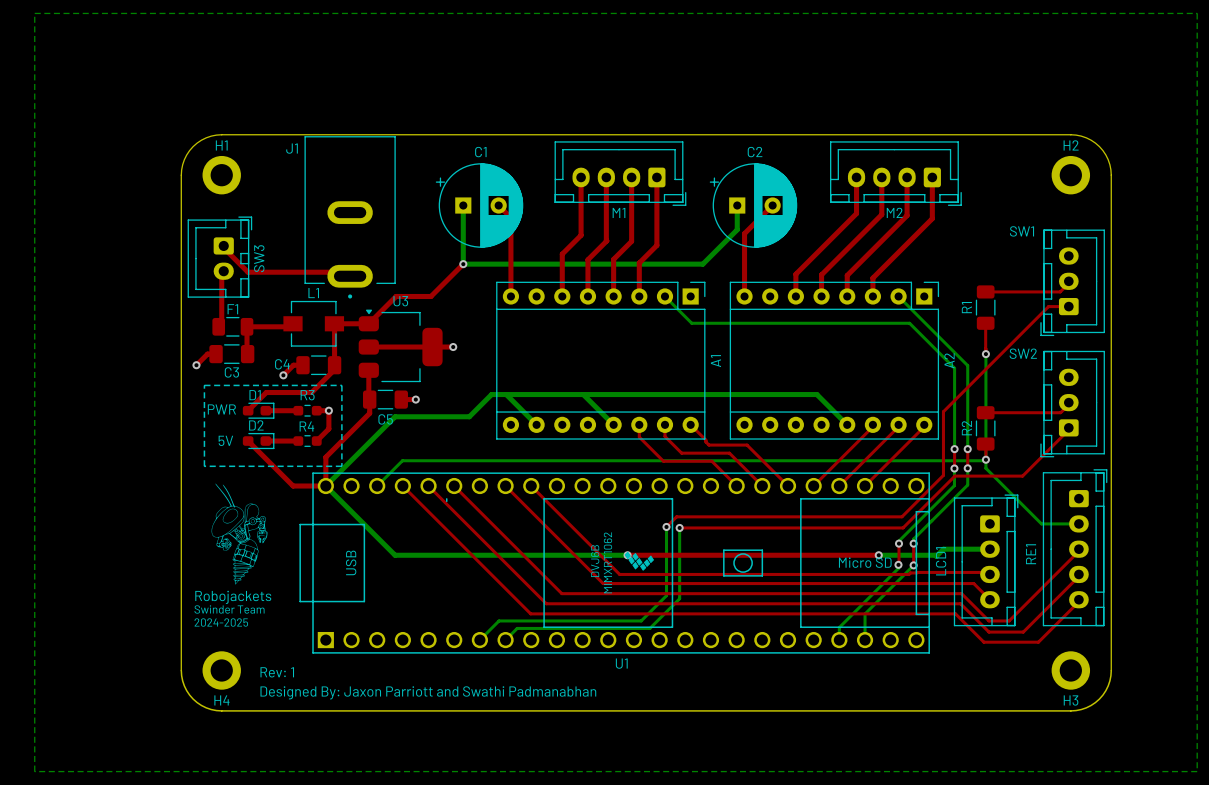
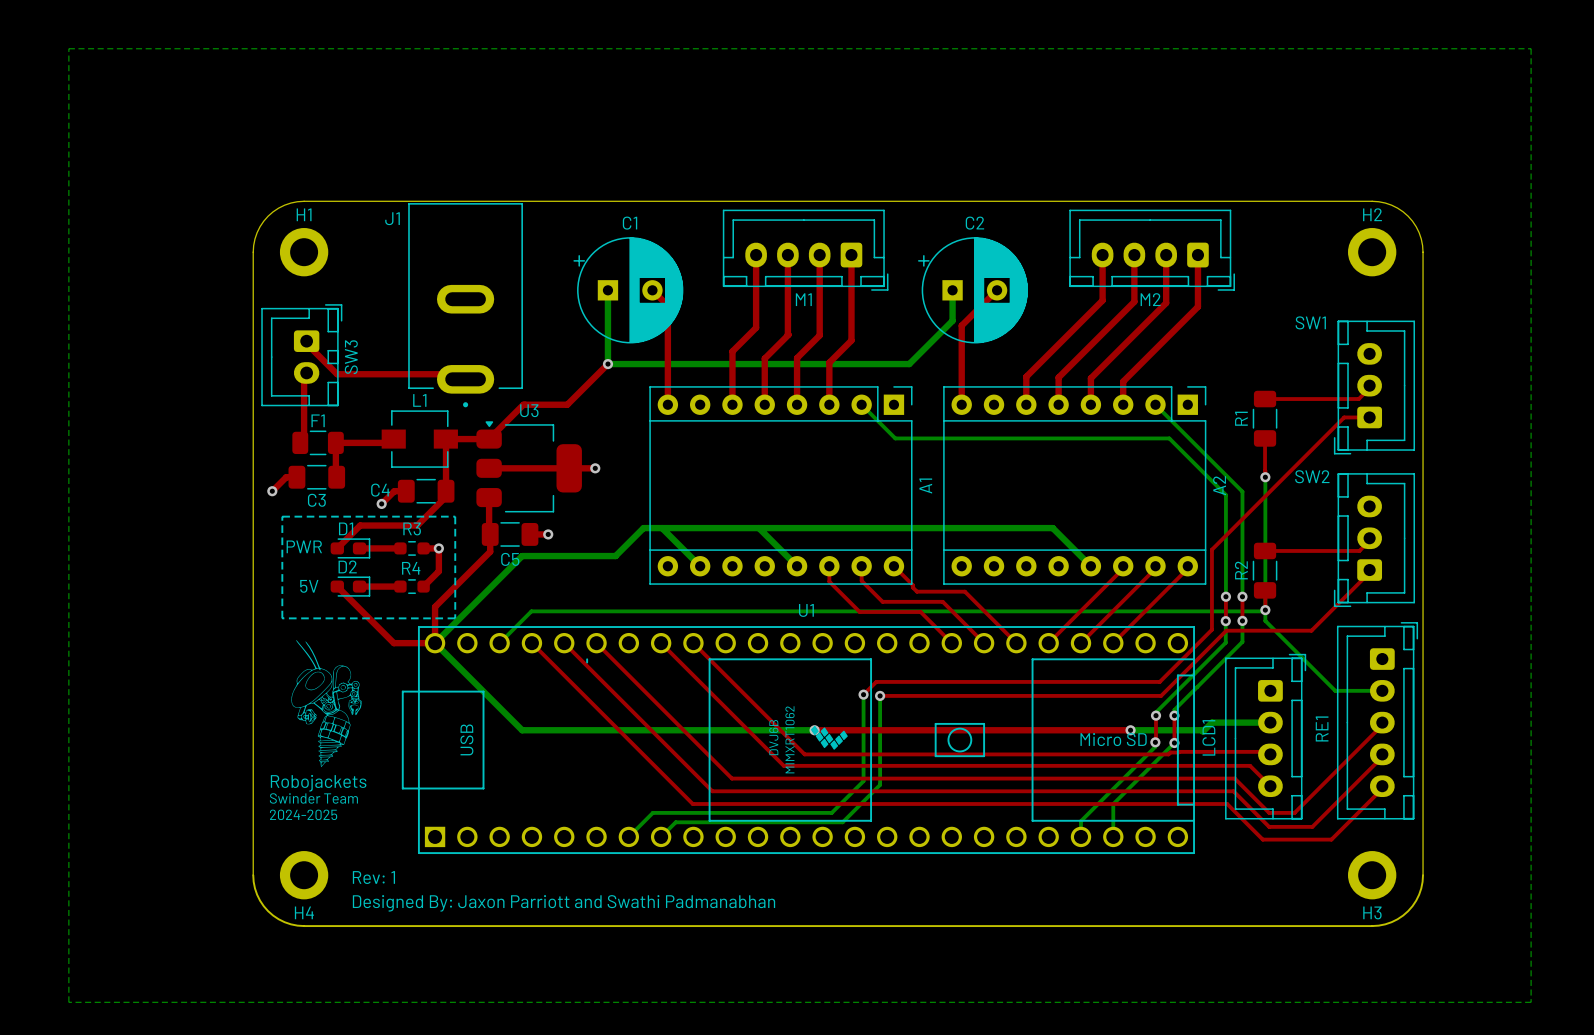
U1 footprint: [299, 472, 930, 654] -> [401, 626, 1195, 855]
U1 name position: U1 (621, 663) -> U1 (806, 610)

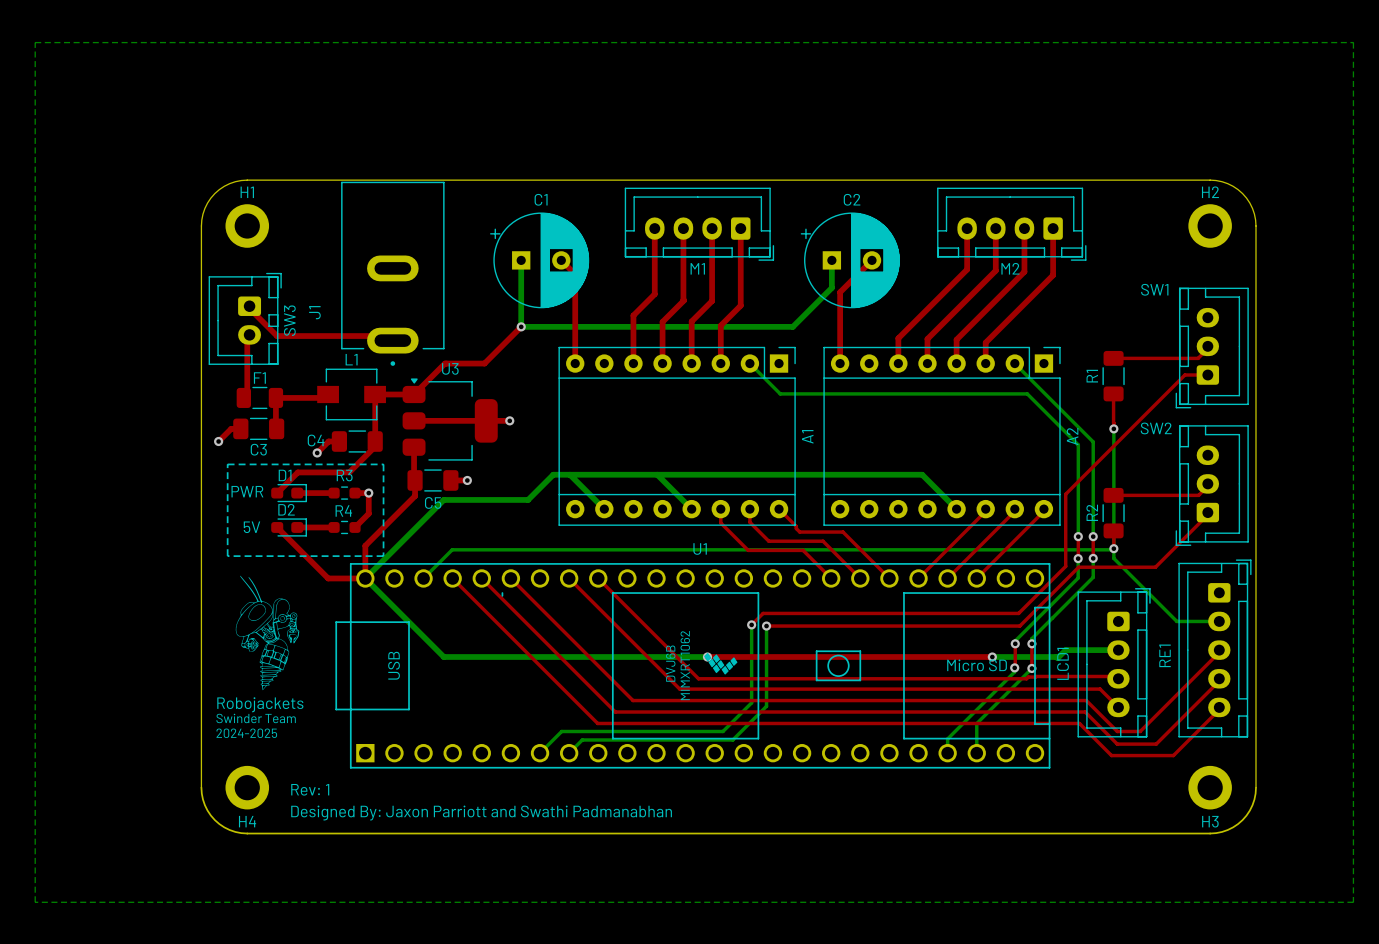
J1 name rotation: 0° (392, 218) -> 90° counterclockwise (314, 312)
J1 name position: J1 (392, 218) -> J1 (314, 312)
U1 footprint: [401, 626, 1195, 855] -> [335, 563, 1051, 769]

